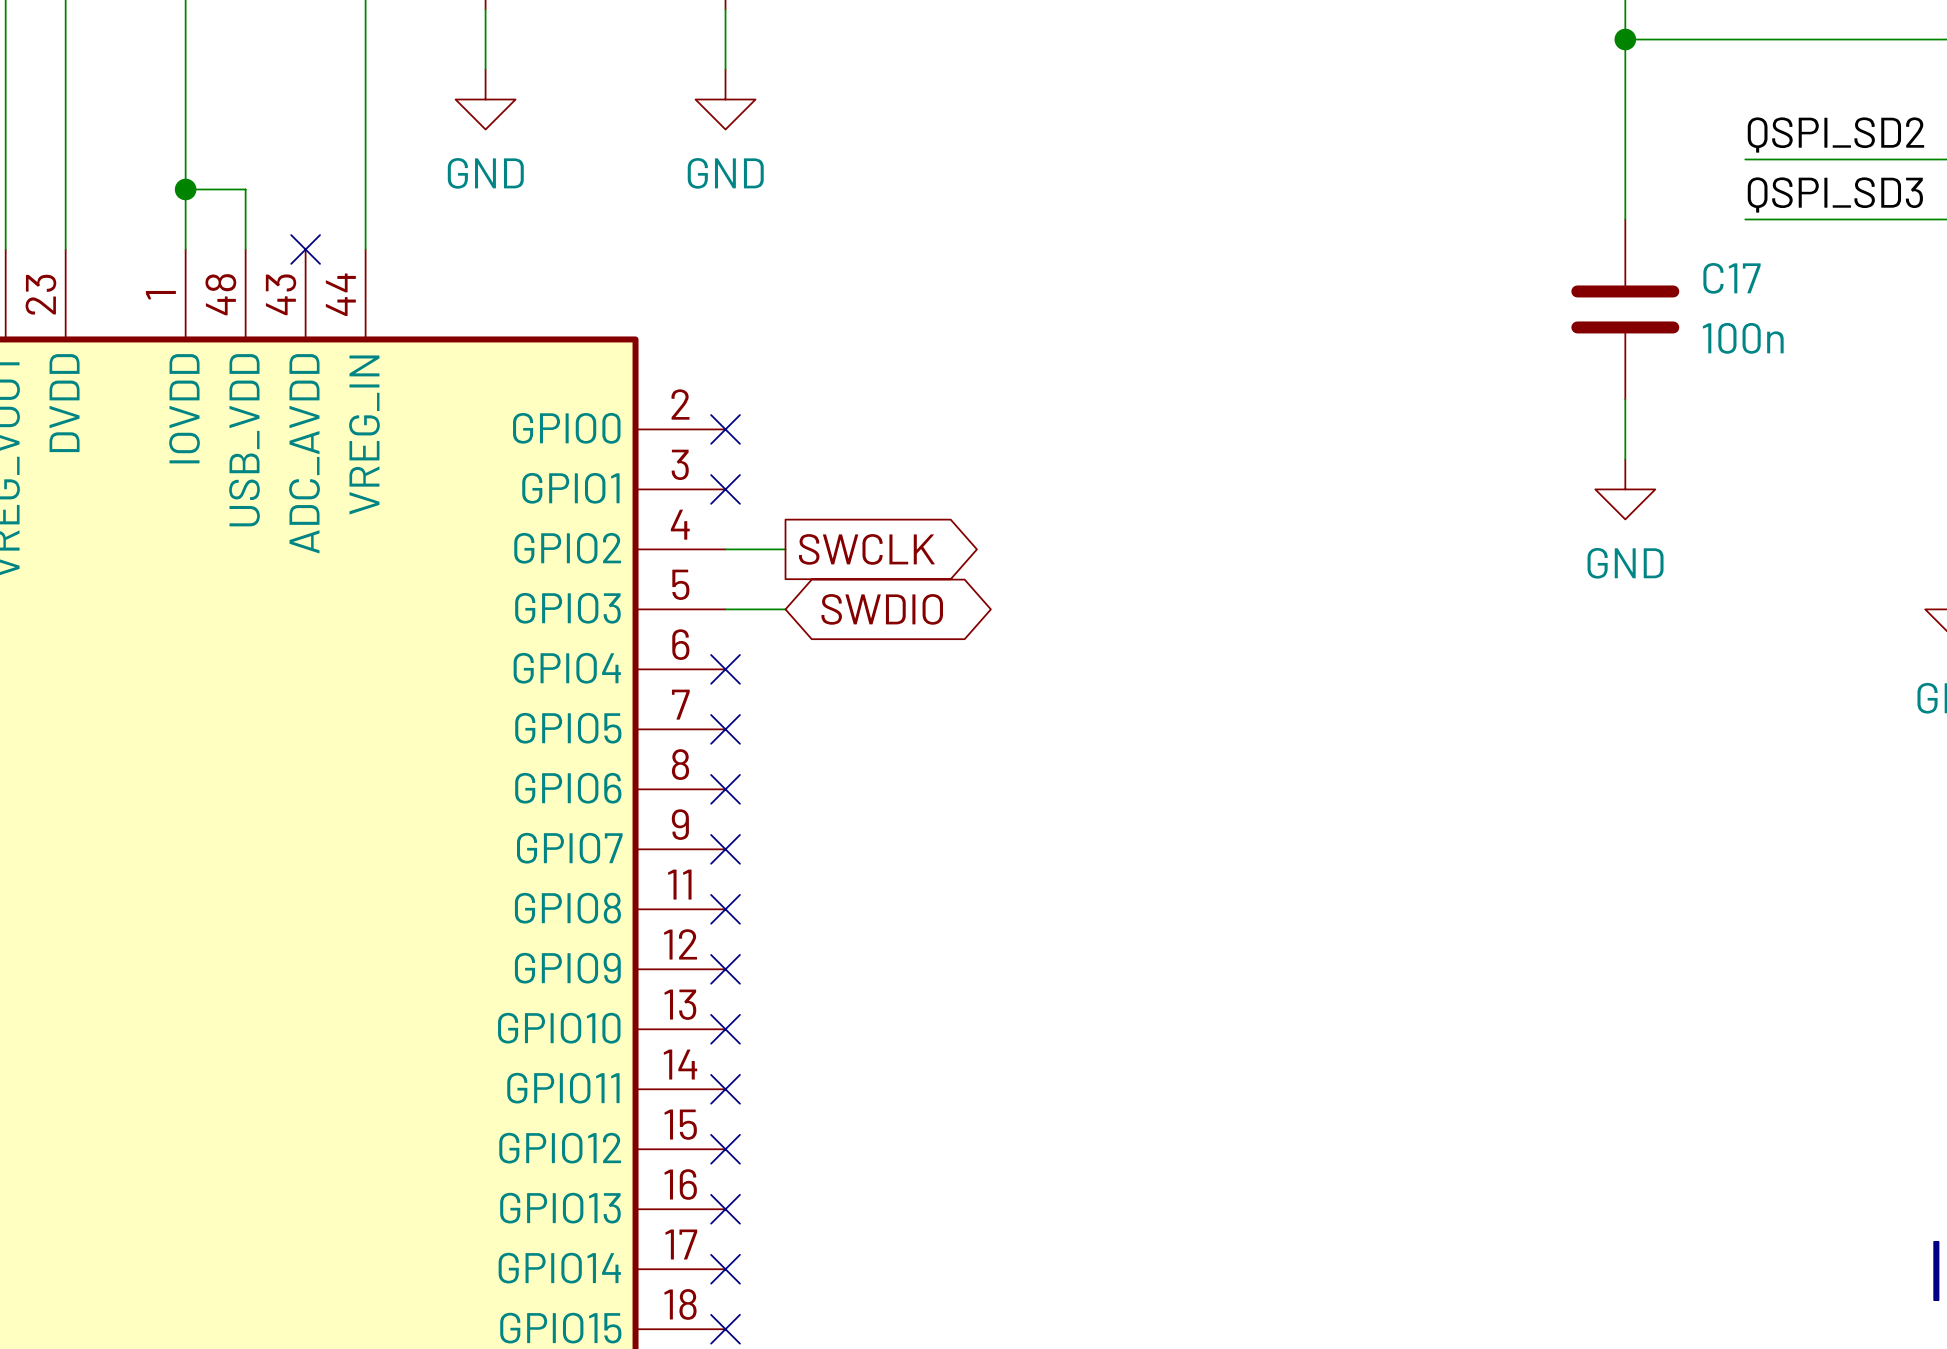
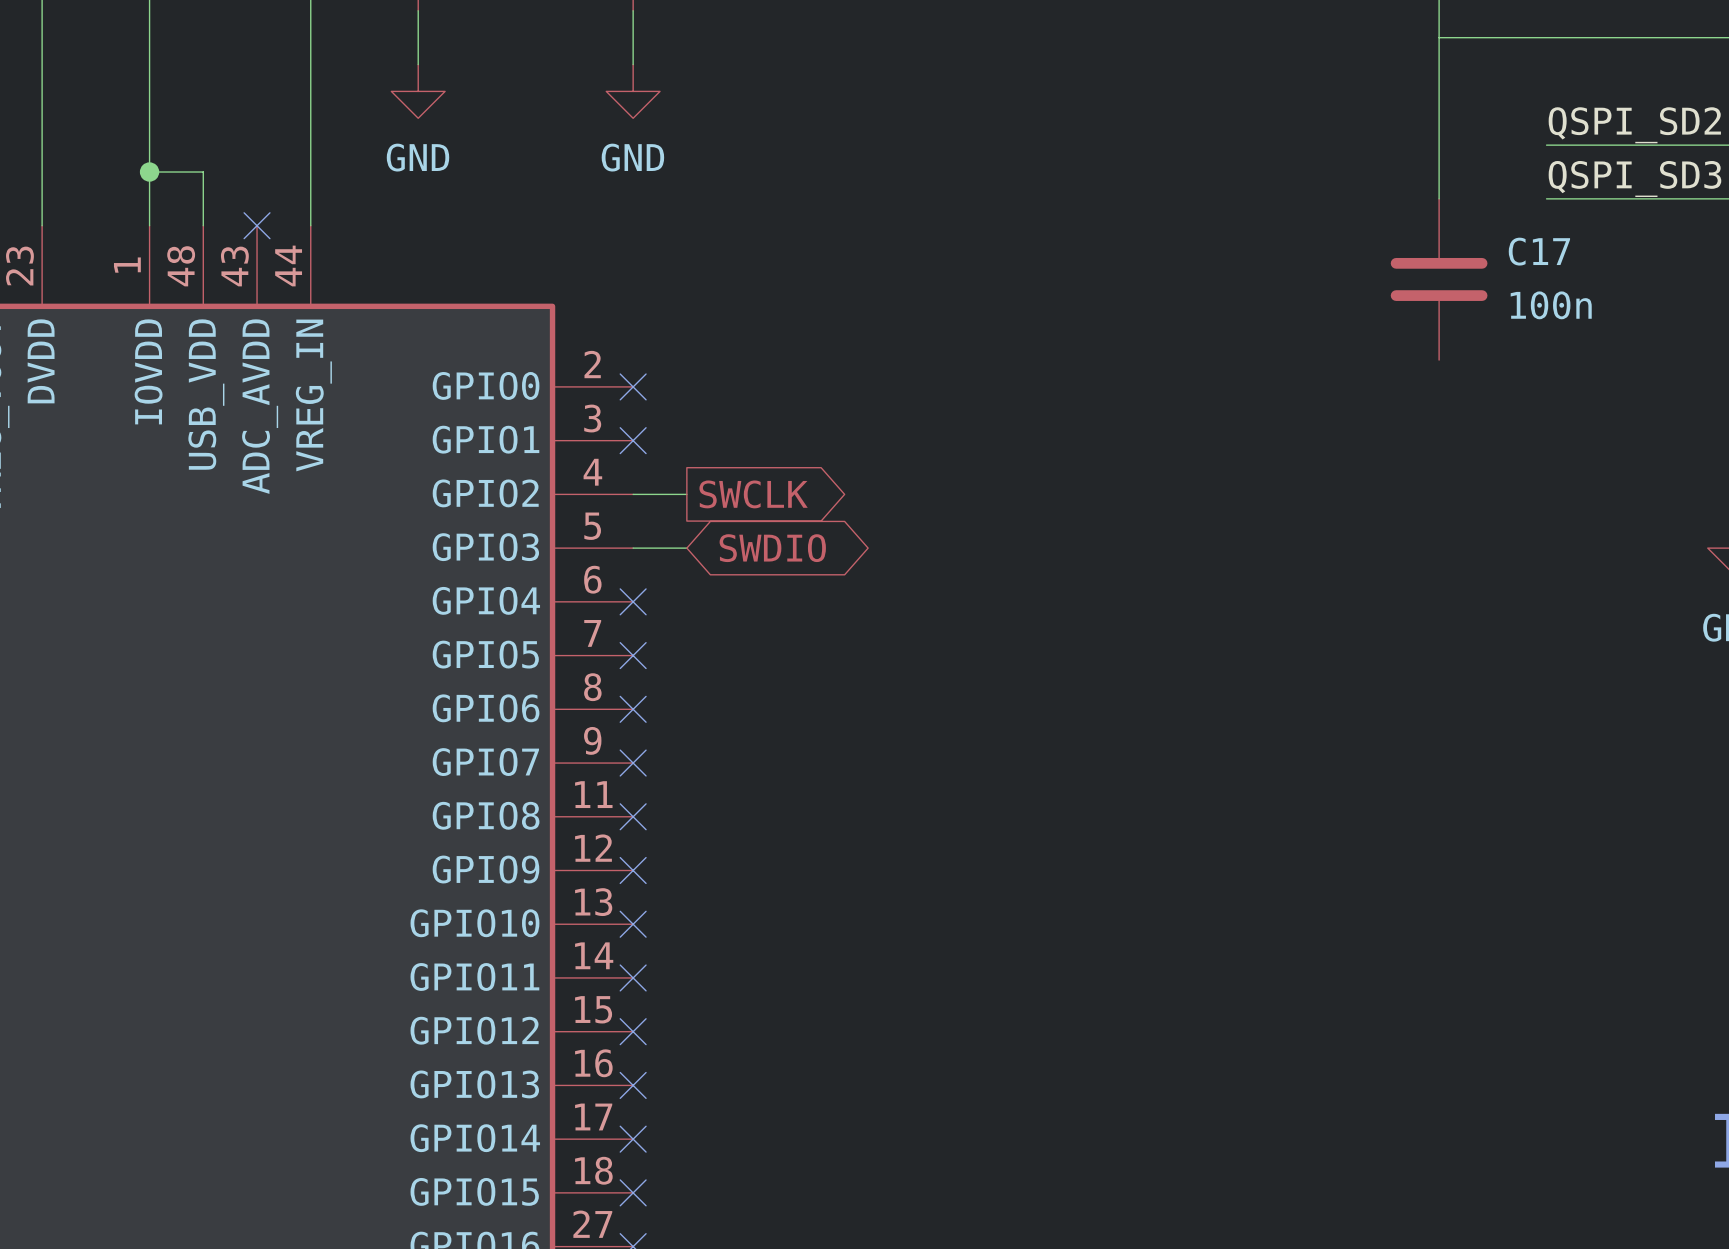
junction: (1625, 39) -> none
wire: (1625, 399) (1625, 459) -> none
power symbol: GND (1625, 489) -> none

